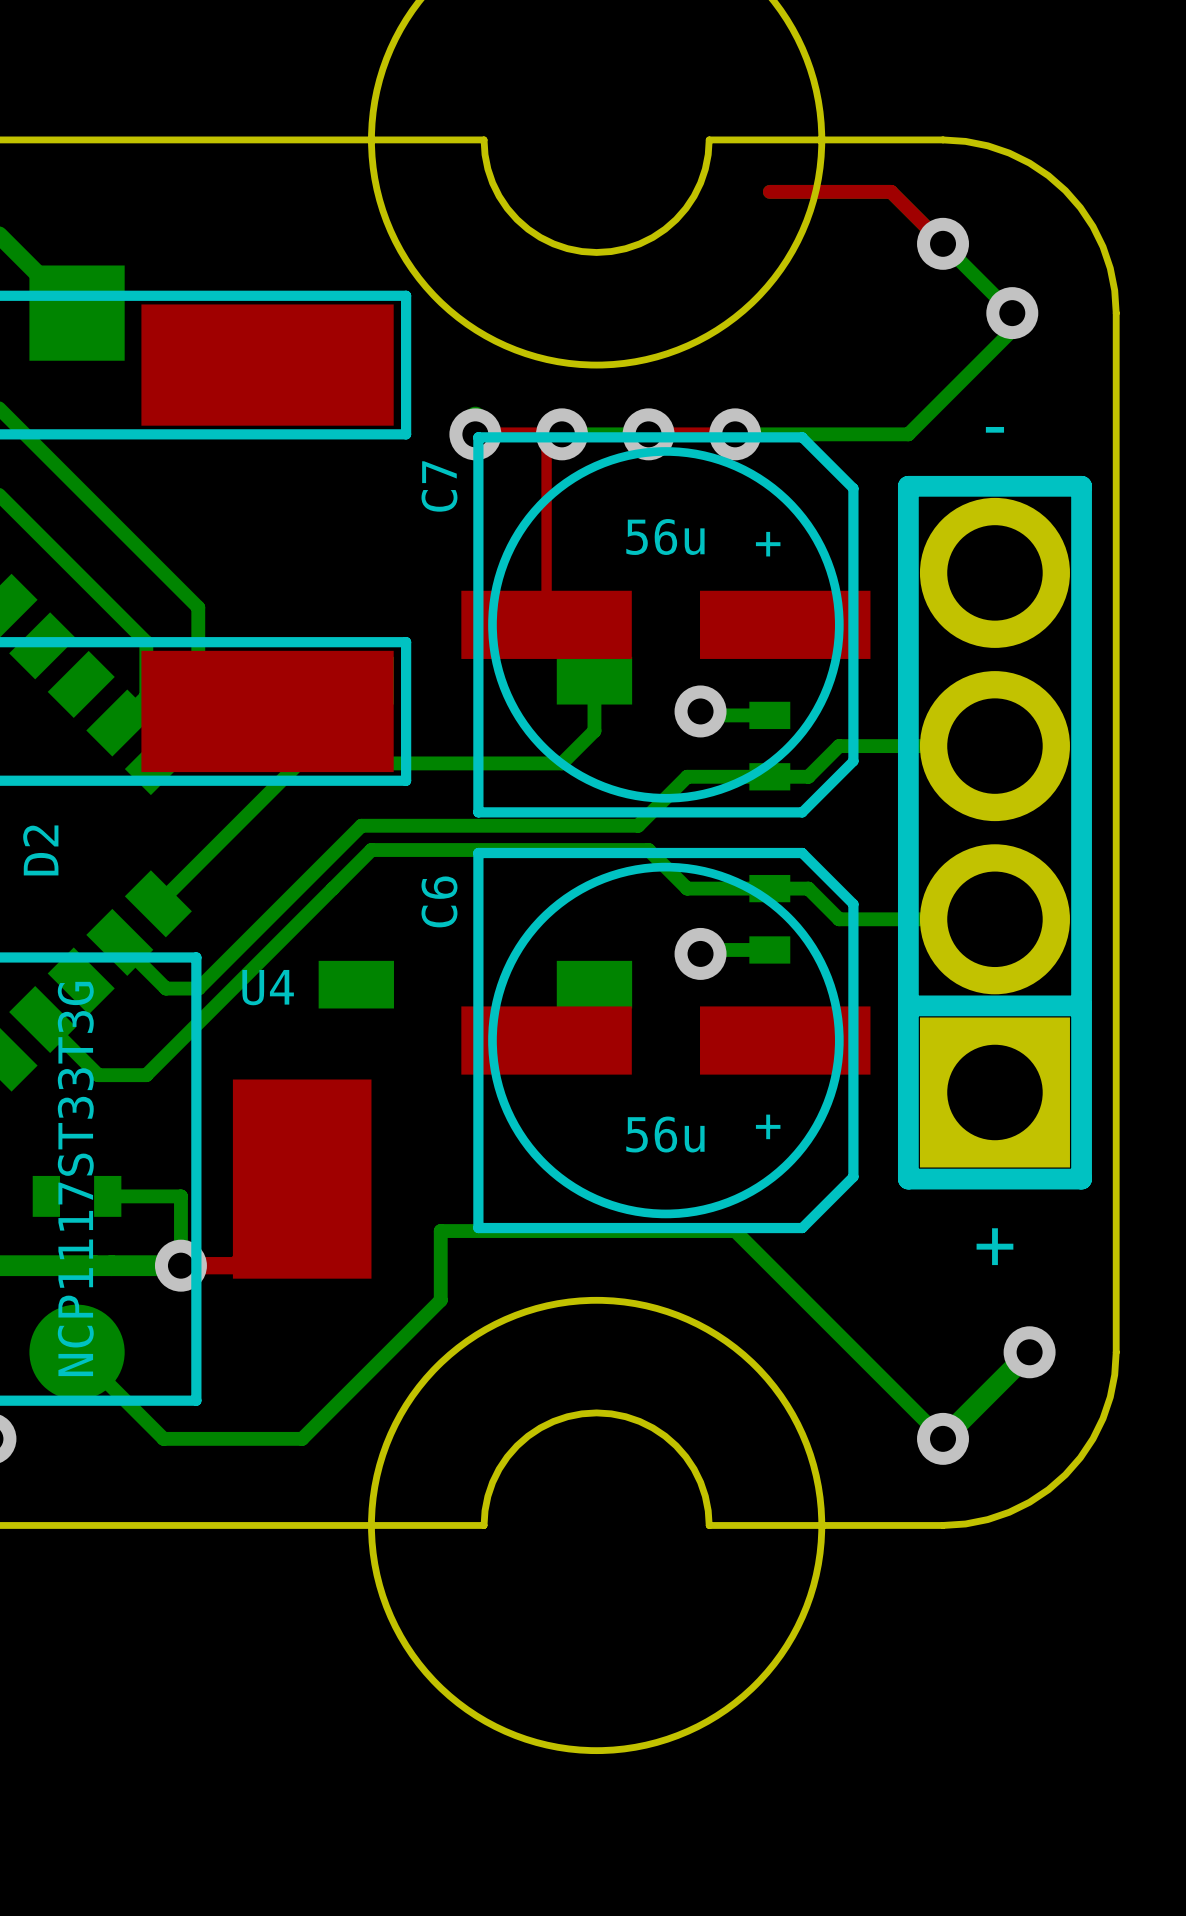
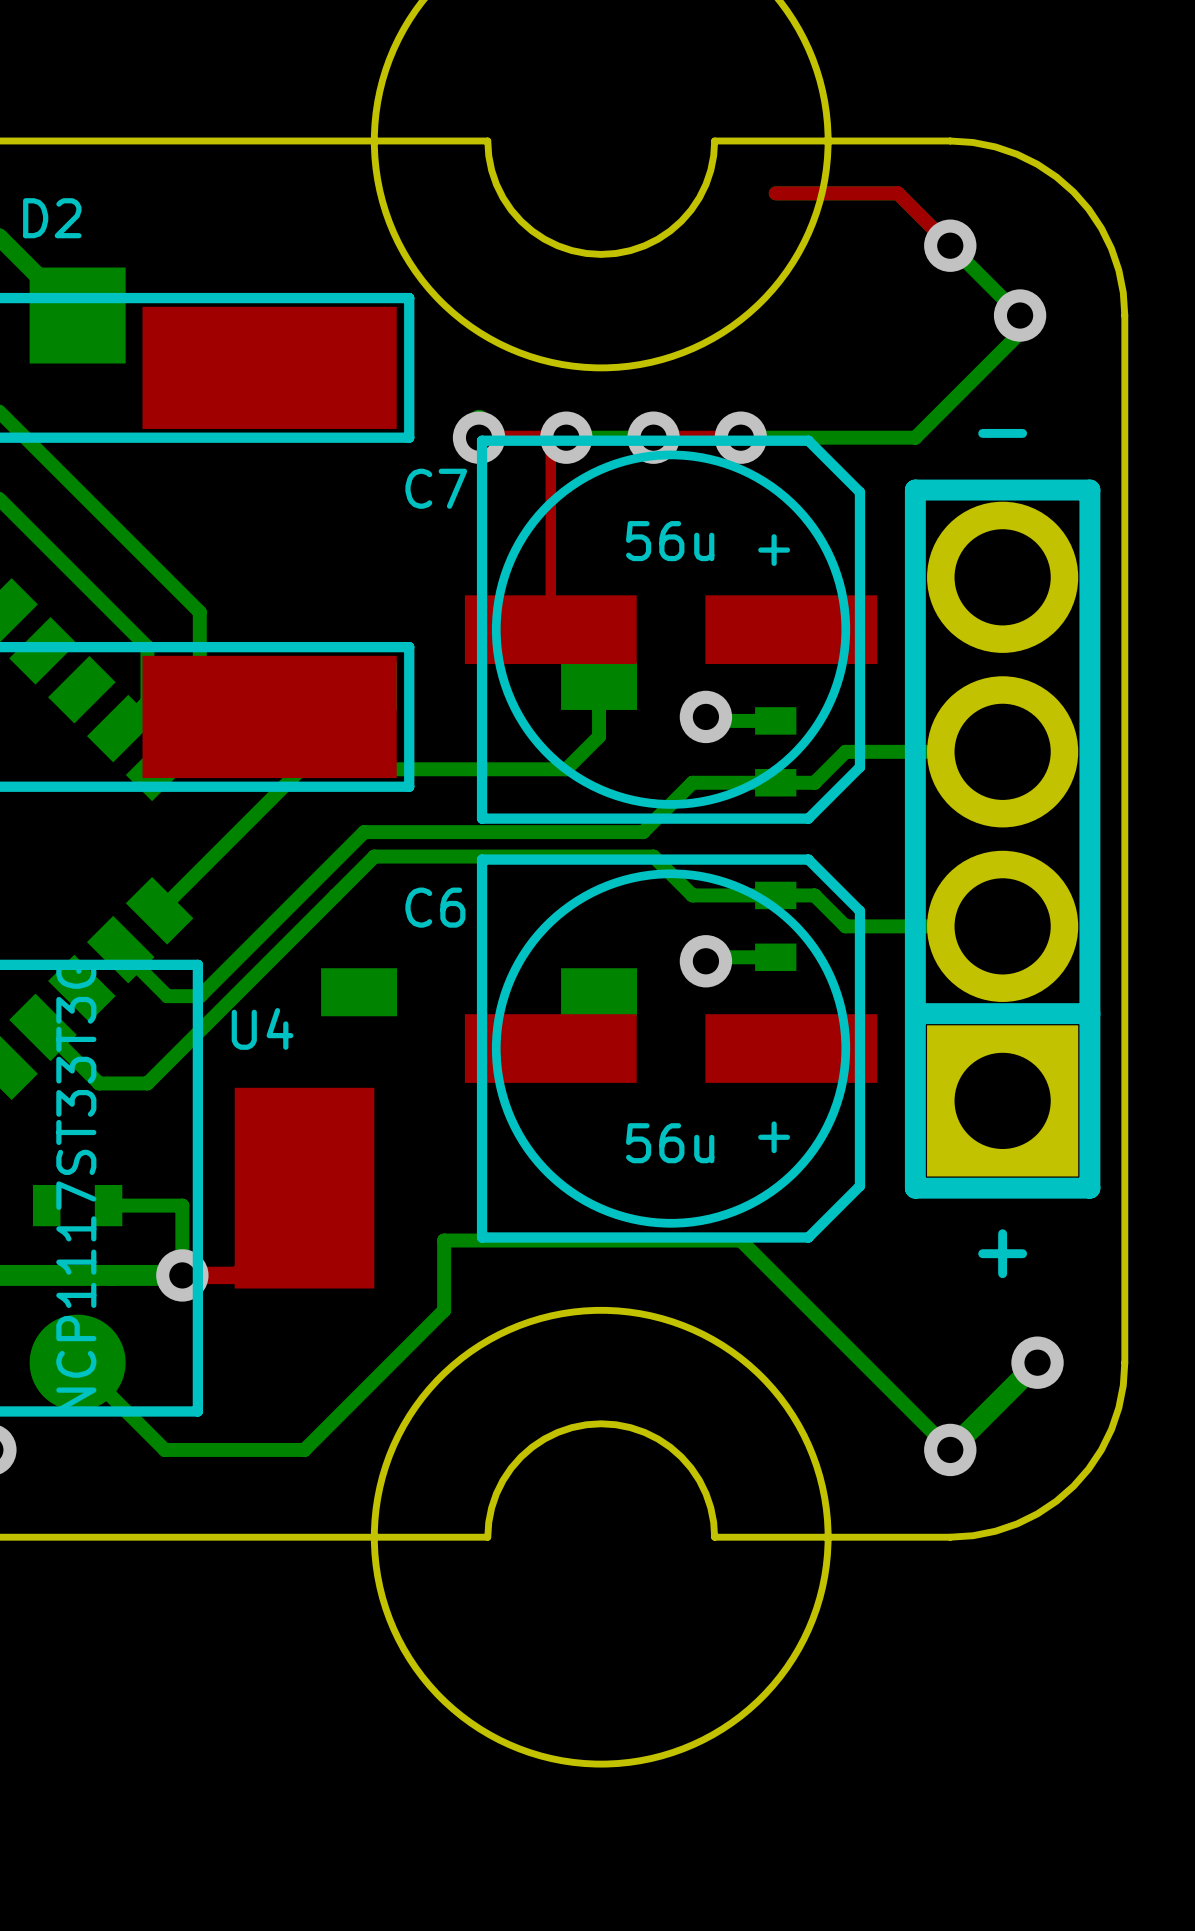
C7 name rotation: 0° (439, 486) -> 90° clockwise (436, 488)
D2 name rotation: 0° (40, 850) -> 90° clockwise (52, 218)
D2 name position: D2 (40, 850) -> D2 (52, 218)
C6 name rotation: 0° (439, 901) -> 90° clockwise (435, 907)
U4 name position: U4 (268, 987) -> U4 (262, 1028)

